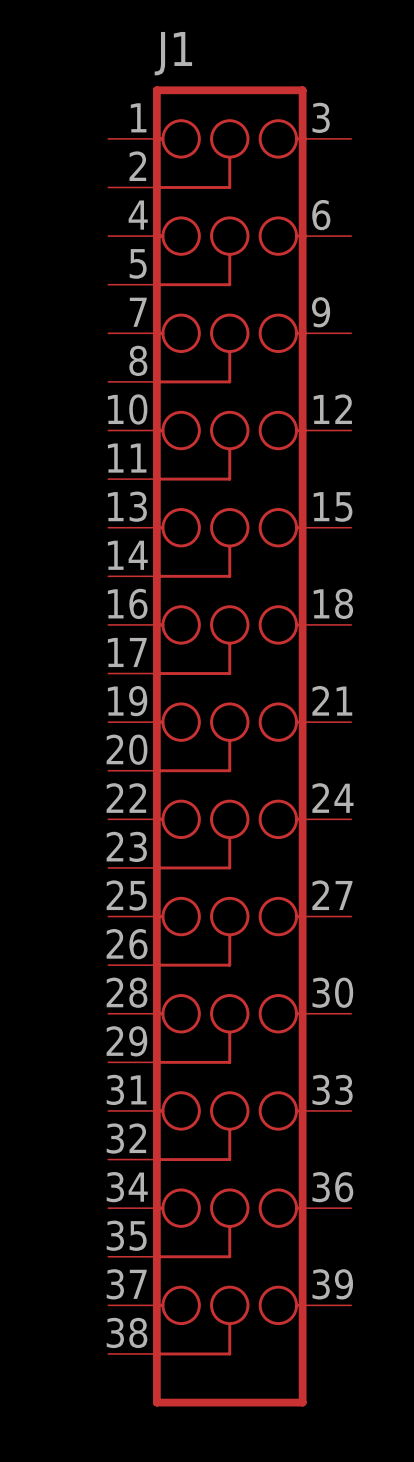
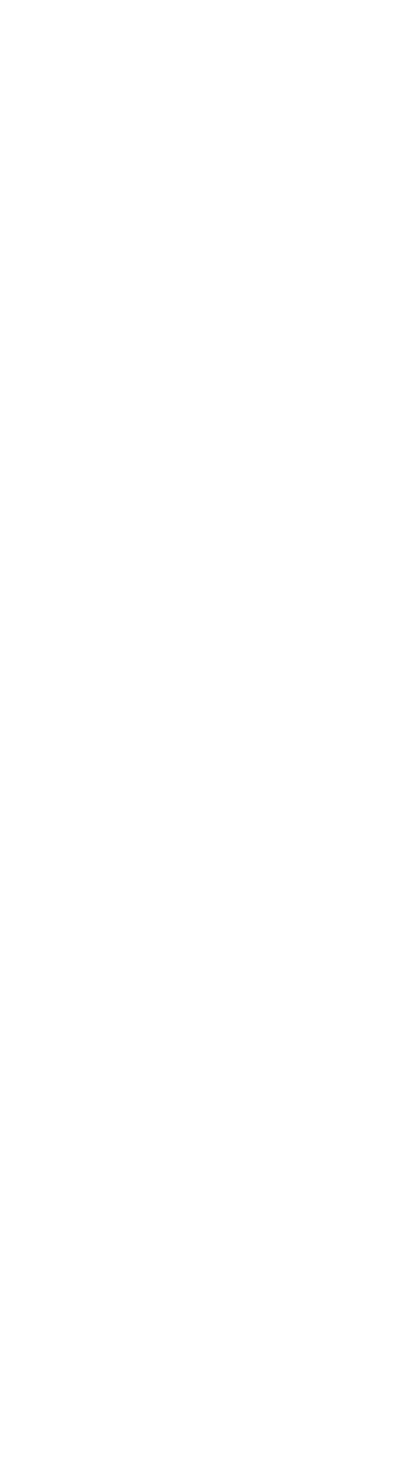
J1: (229, 746) -> none

